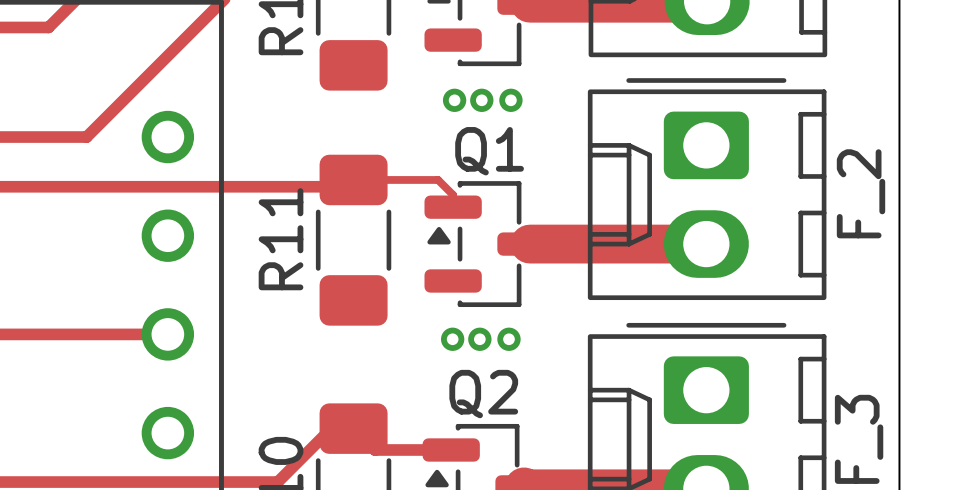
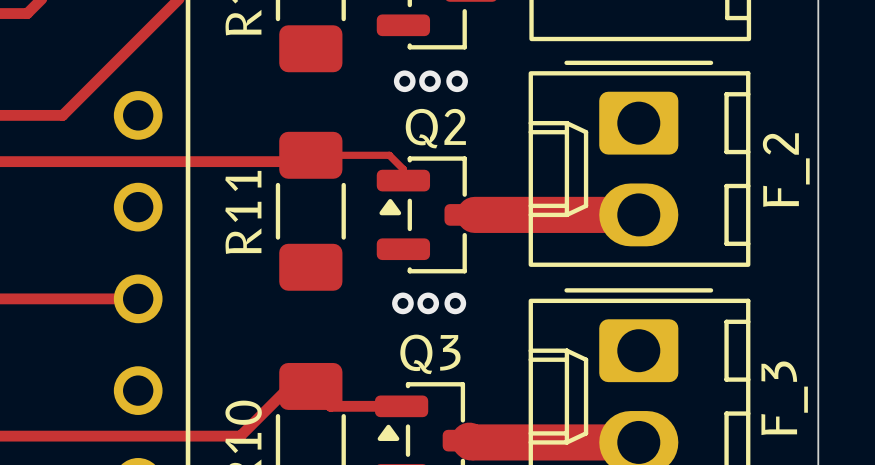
Q1 name: Q1 (489, 151) -> Q2 (435, 128)
Q2 name: Q2 (483, 394) -> Q3 (430, 354)

